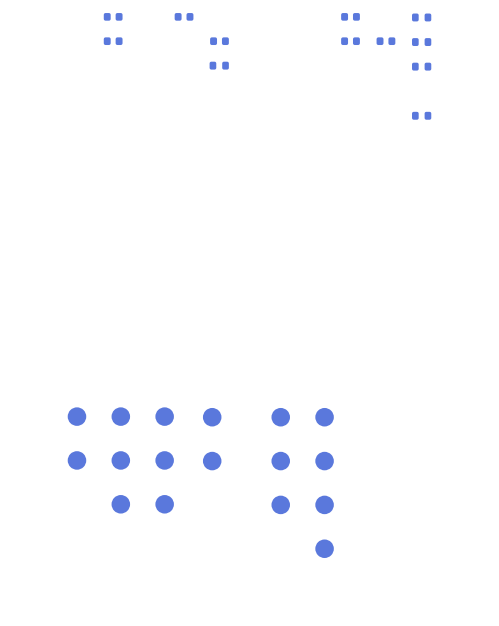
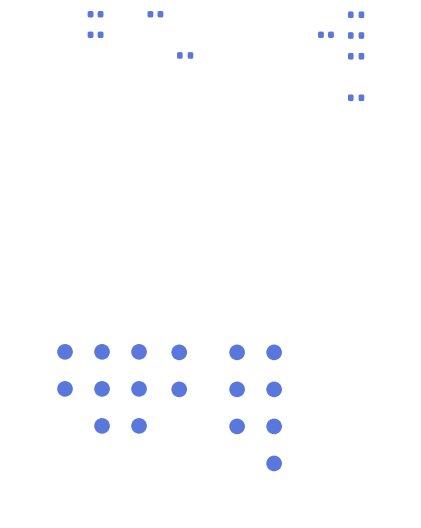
part: (350, 16) -> none
part: (219, 41) -> none
part: (350, 41) -> none

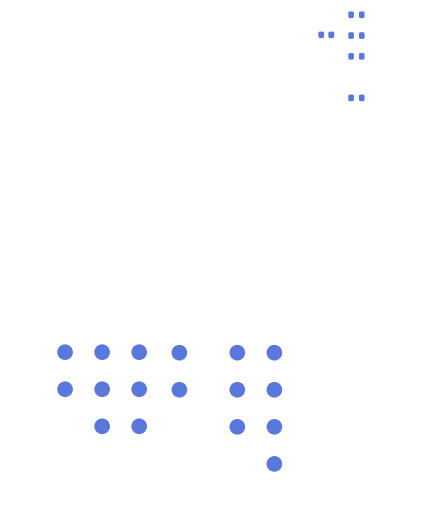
part: (95, 14) -> none
part: (155, 14) -> none
part: (95, 34) -> none
part: (185, 55) -> none

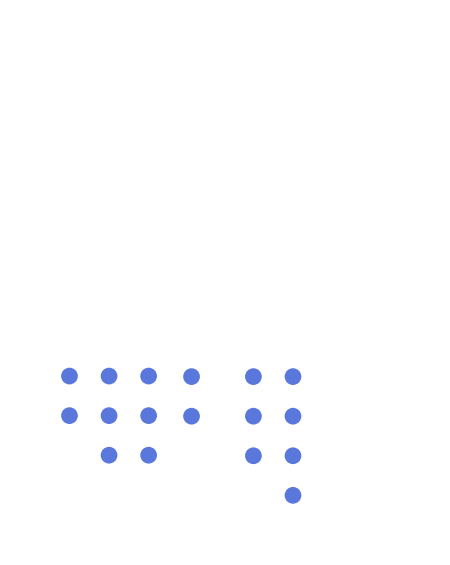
part: (356, 14) -> none
part: (326, 34) -> none
part: (356, 35) -> none
part: (356, 56) -> none
part: (356, 97) -> none

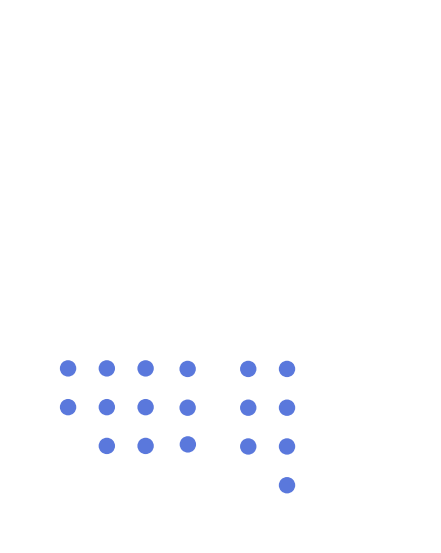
part: none -> (187, 444)

